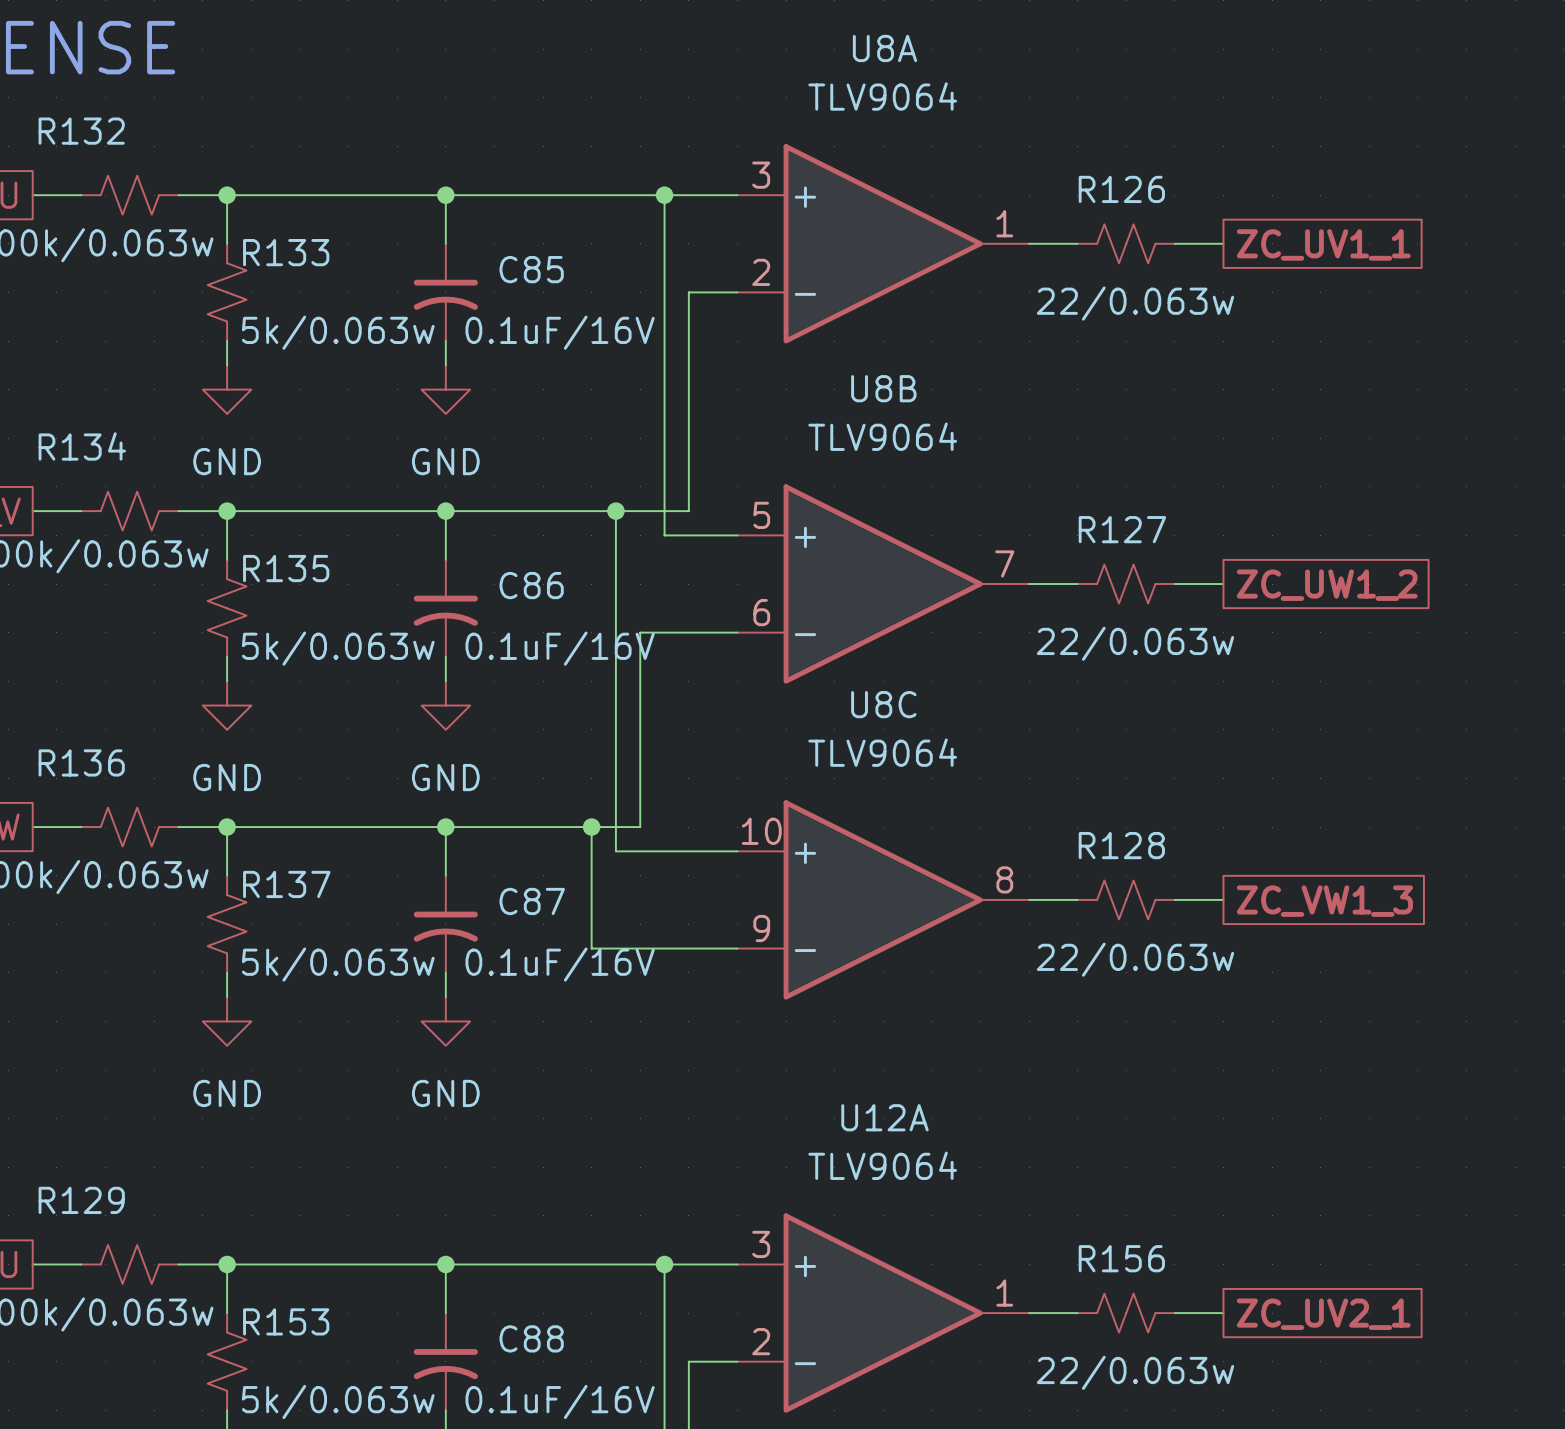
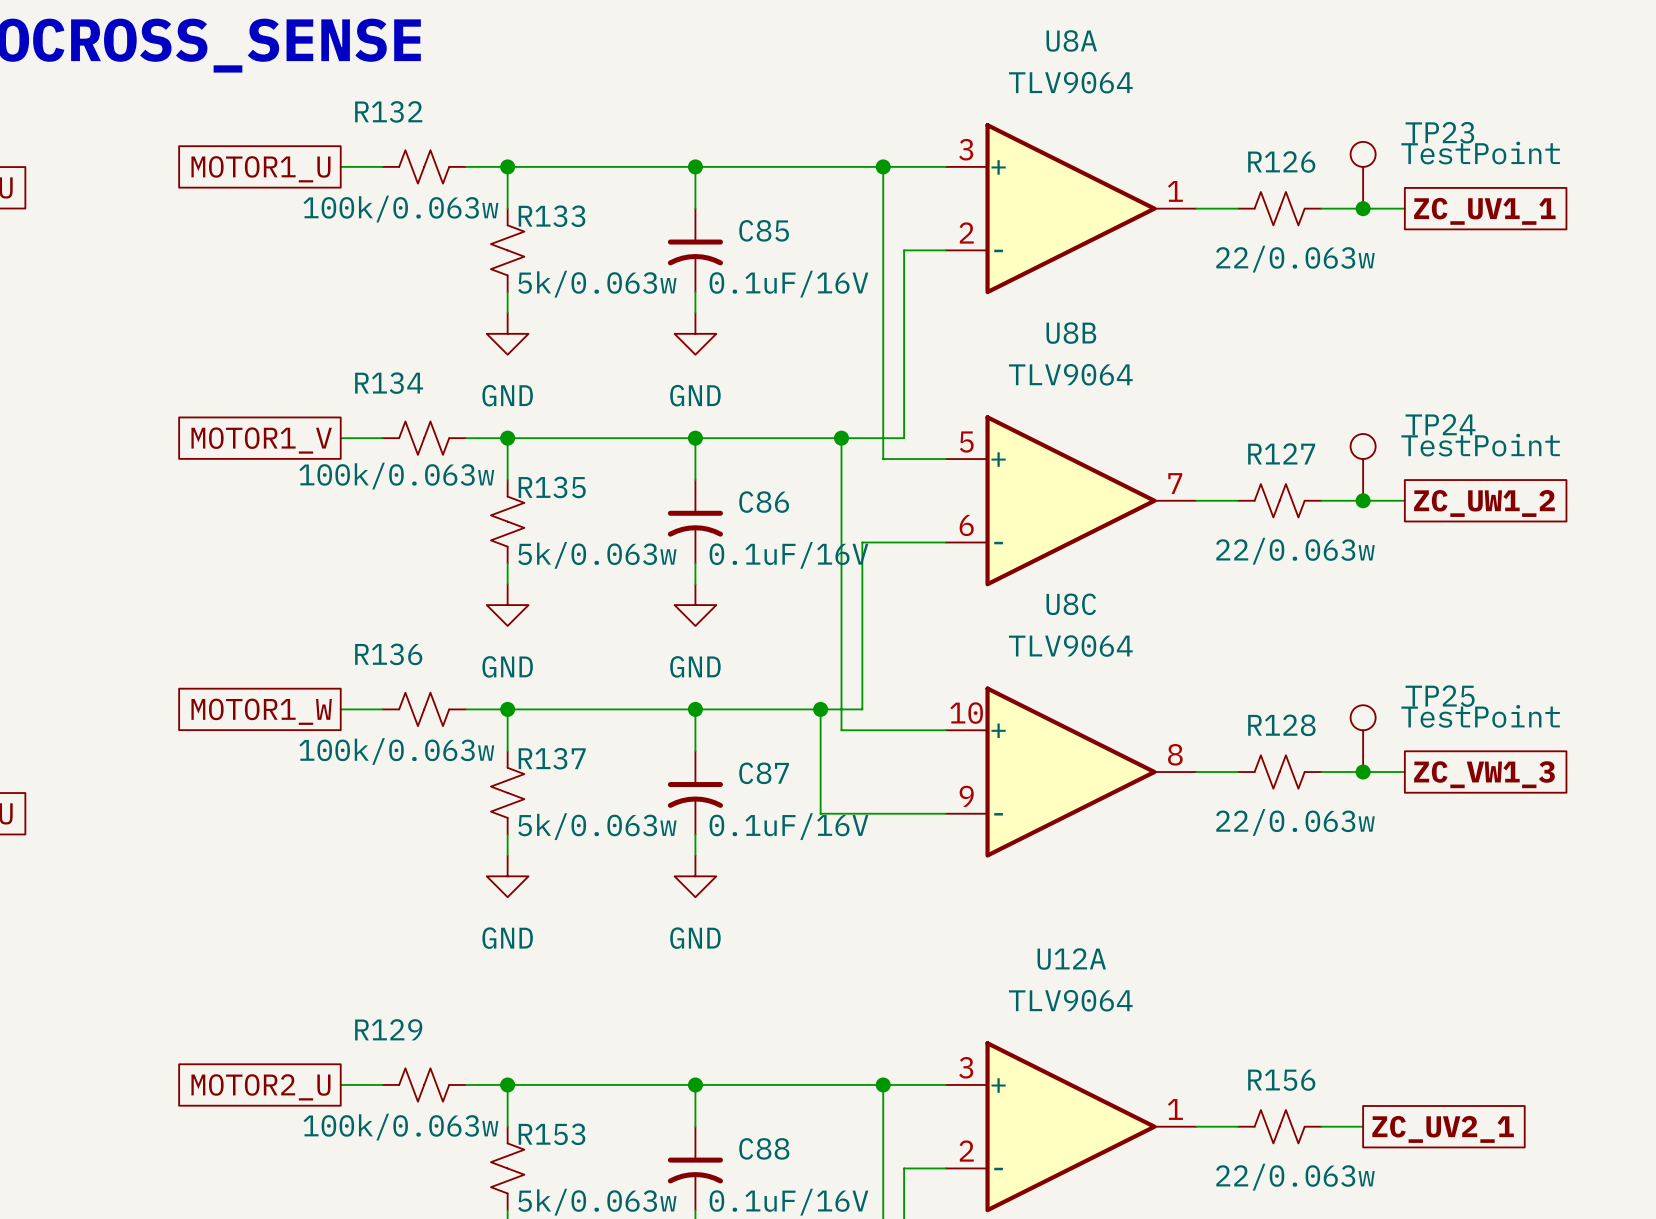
TP23: none -> TestPoint (1363, 175)
wire: none -> (1363, 208) (1404, 208)
junction: none -> (1363, 208)
global label position: ZC_UV1_1 (1323, 244) -> ZC_UV1_1 (1484, 211)
TP24: none -> TestPoint (1363, 467)
wire: none -> (1363, 500) (1404, 500)
junction: none -> (1363, 500)
global label position: ZC_UW1_2 (1327, 585) -> ZC_UW1_2 (1484, 503)
TP25: none -> TestPoint (1363, 738)
wire: none -> (1363, 772) (1404, 772)
junction: none -> (1363, 772)
global label position: ZC_VW1_3 (1324, 901) -> ZC_VW1_3 (1484, 774)

